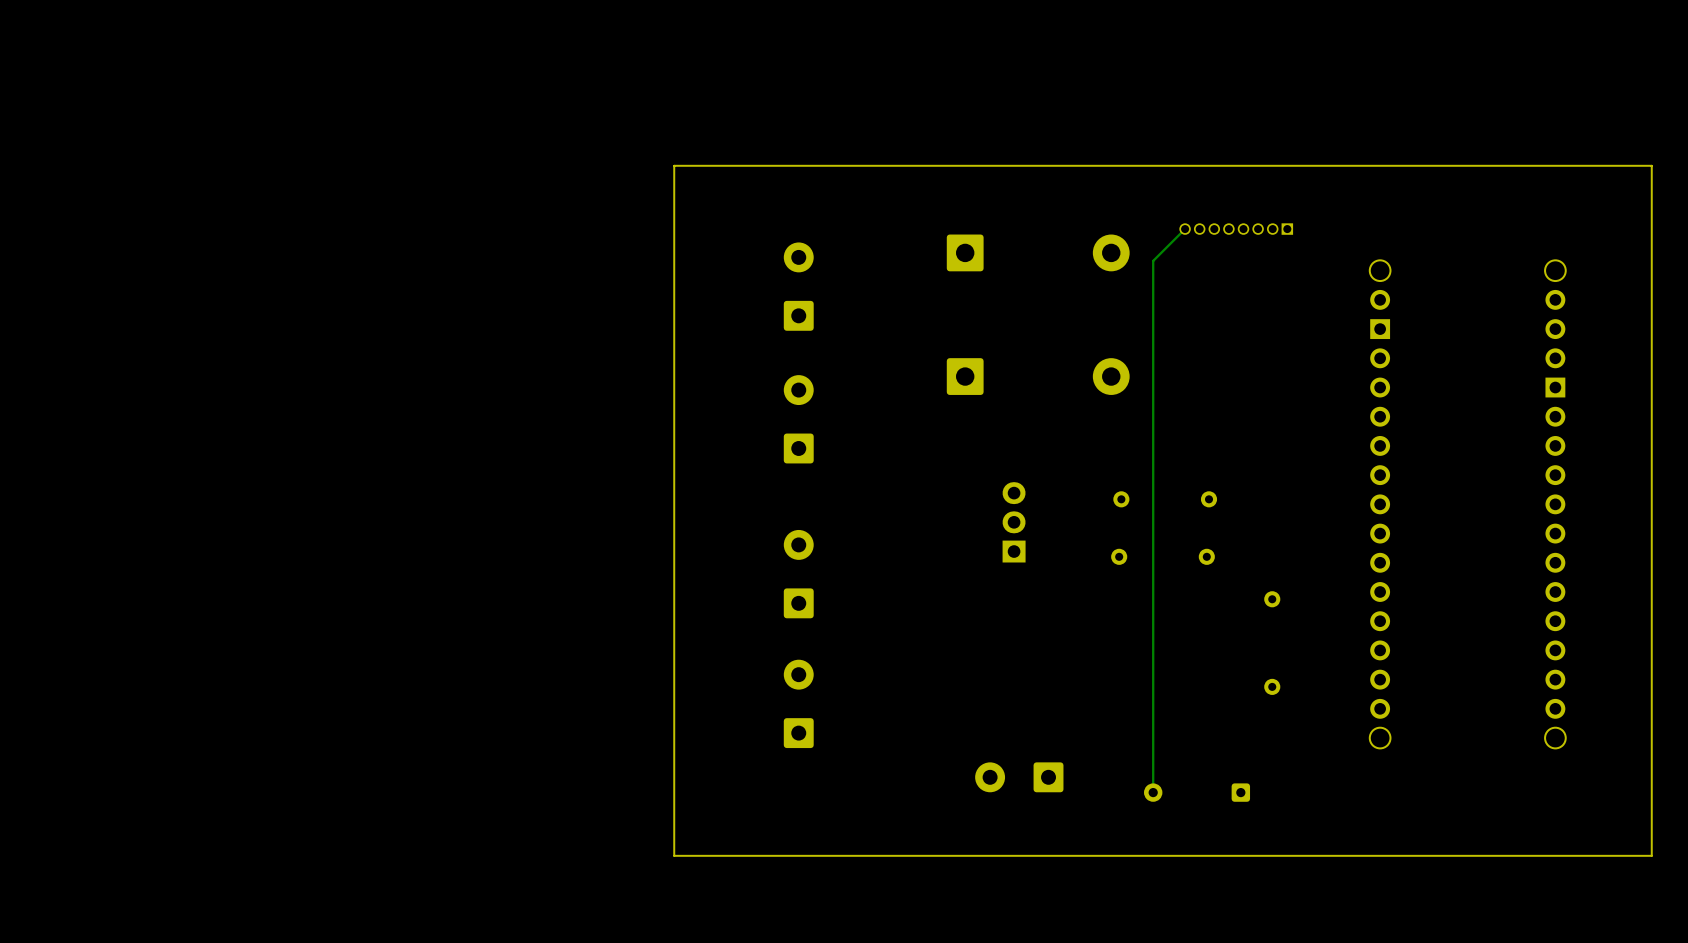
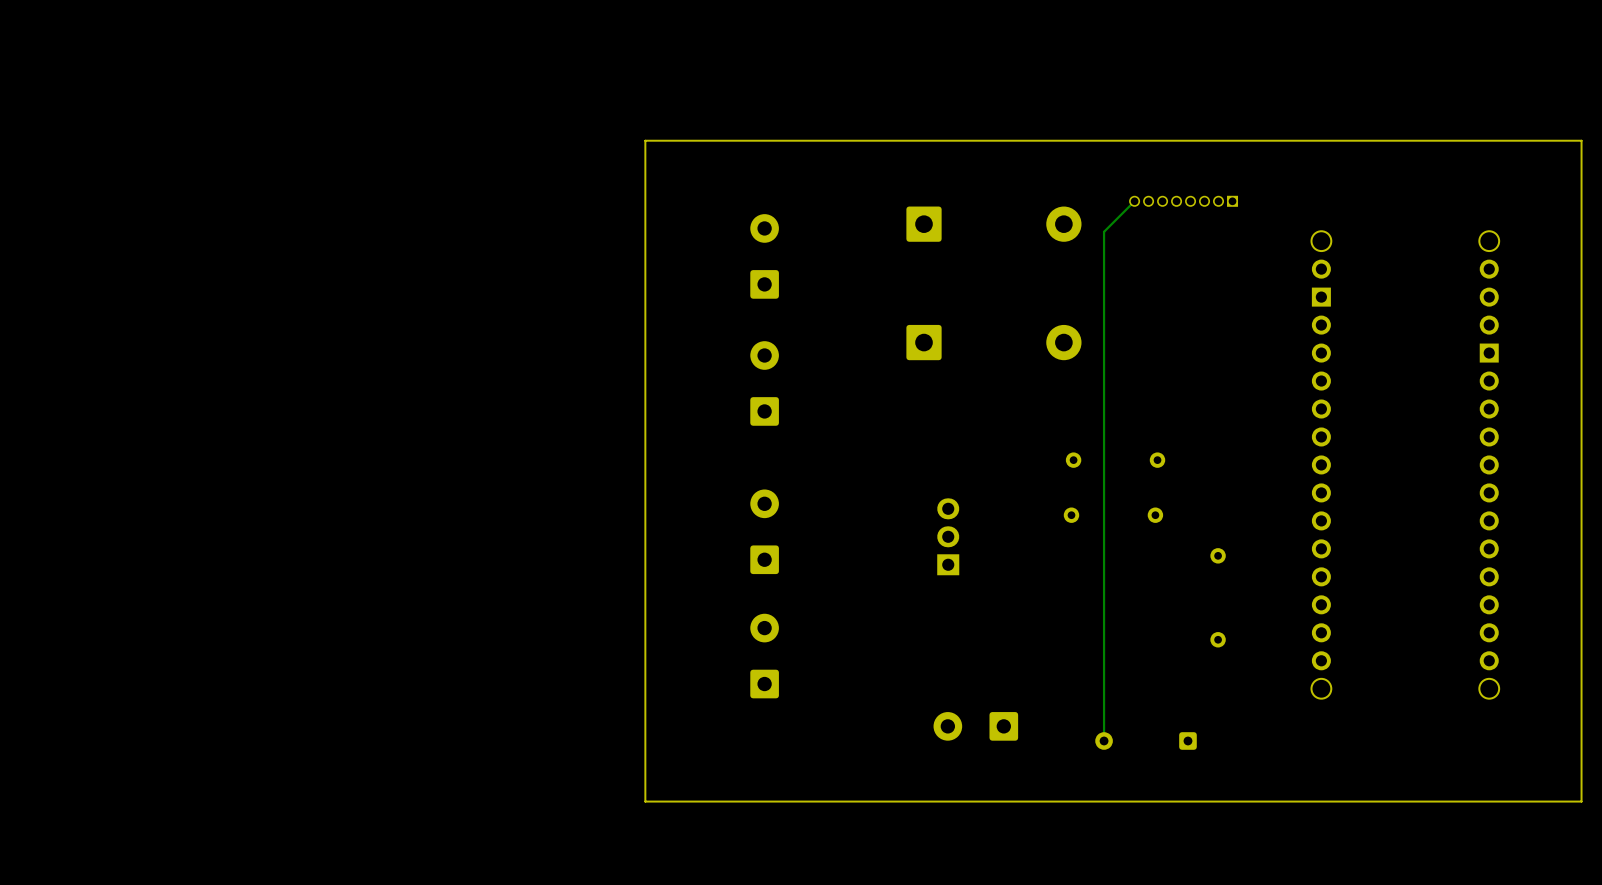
part position: (1014, 522) -> (948, 536)

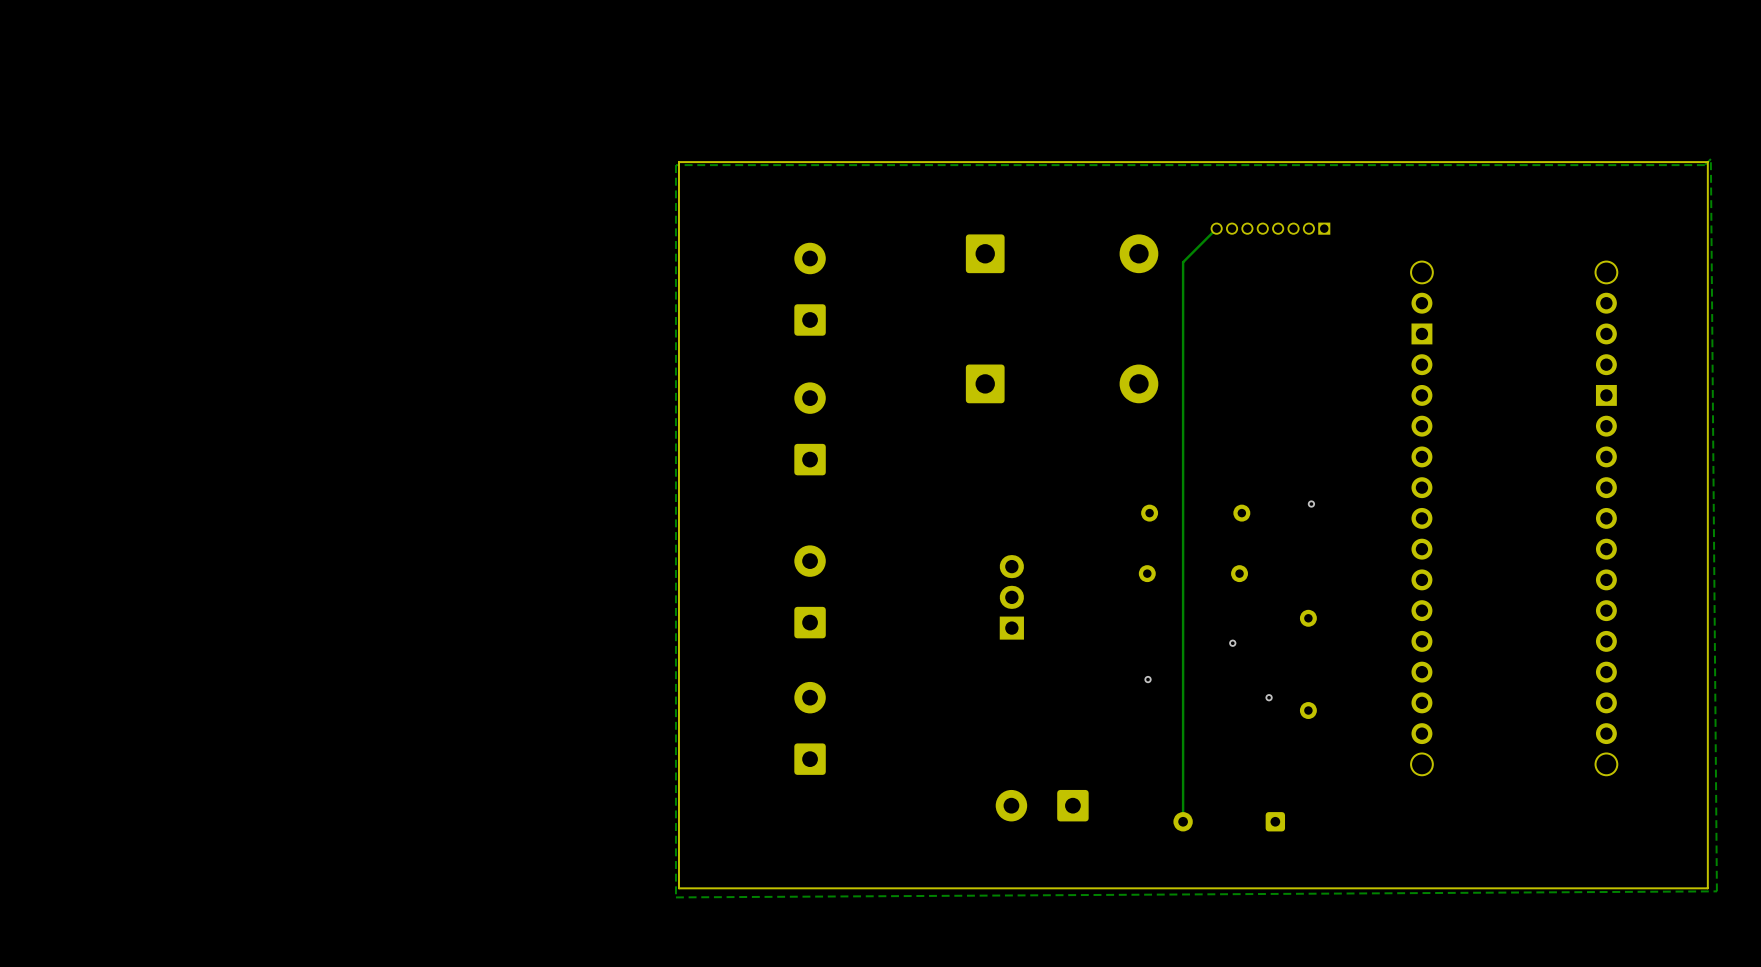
zone outline: none -> (1710, 159) (1716, 891) (675, 897) (675, 165) (1704, 165) (1710, 159)
via: none -> (1311, 504)
via: none -> (1232, 643)
via: none -> (1148, 679)
via: none -> (1269, 697)

